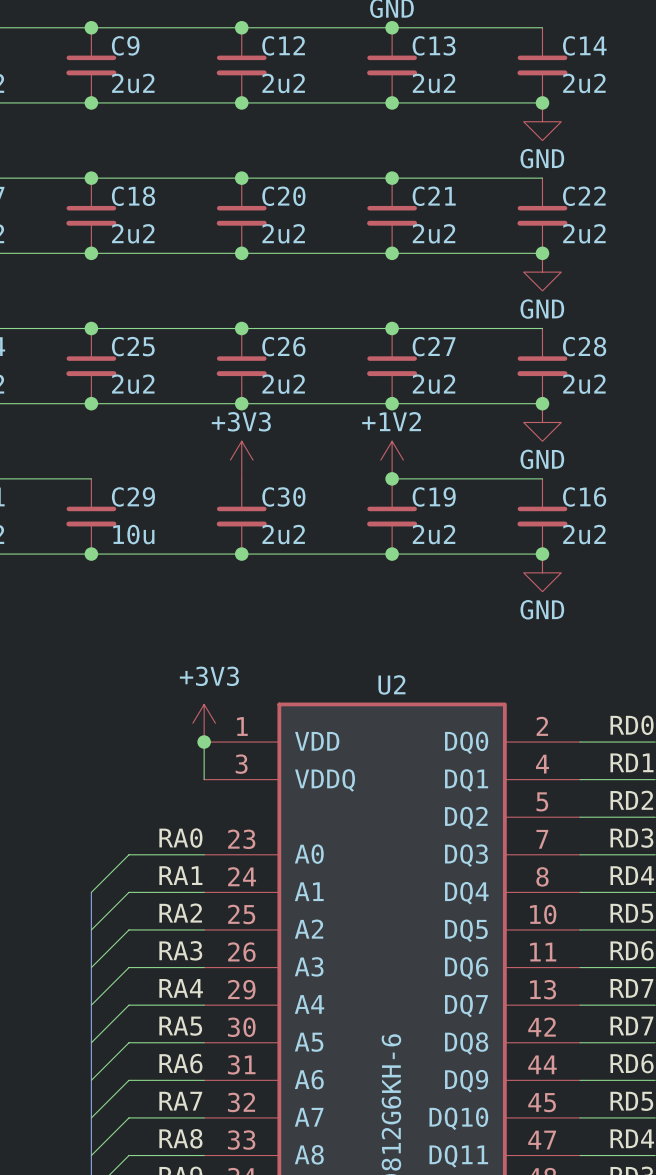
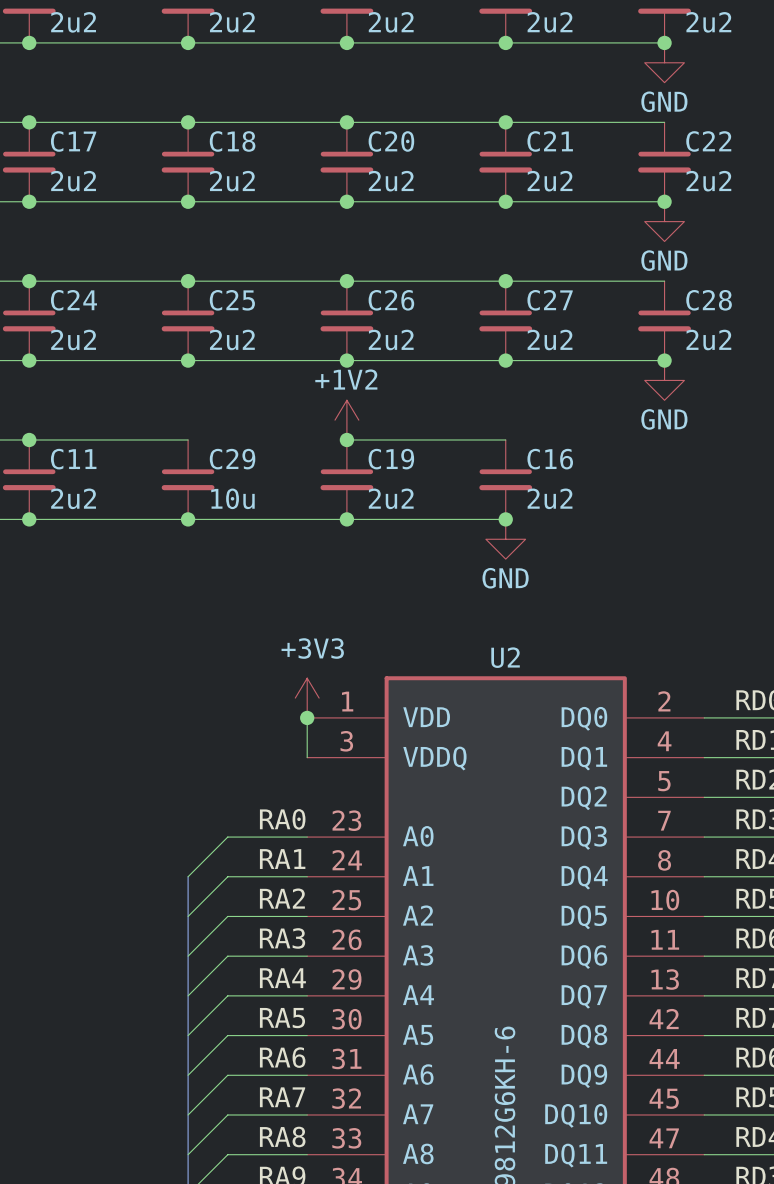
power symbol: +3V3 (241, 460) -> +1V2 (346, 420)
power symbol: +1V2 (392, 460) -> none
junction: none -> (346, 439)
wire: (392, 478) (542, 478) -> (505, 439) (346, 439)
junction: (392, 478) -> none
C30 name: C30 (283, 496) -> C19 (391, 459)
C19 name: C19 (434, 496) -> C16 (550, 459)
C16: 2u2 (542, 516) -> none
wire: (392, 554) (542, 554) -> none
junction: (542, 554) -> none
power symbol position: GND (542, 572) -> GND (505, 539)

